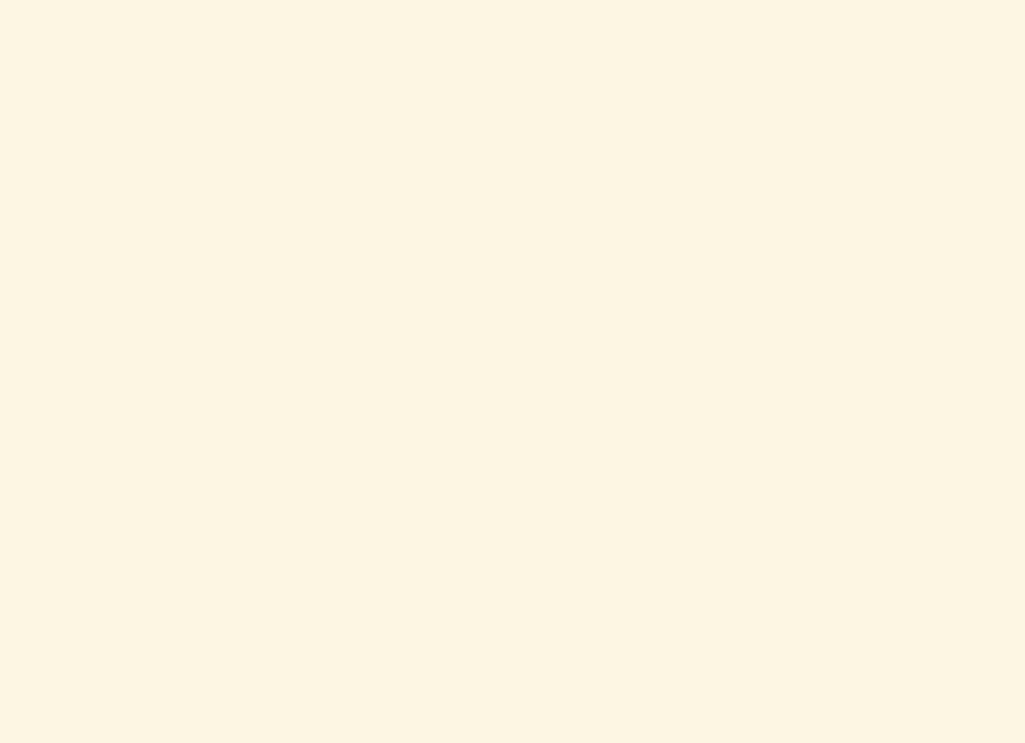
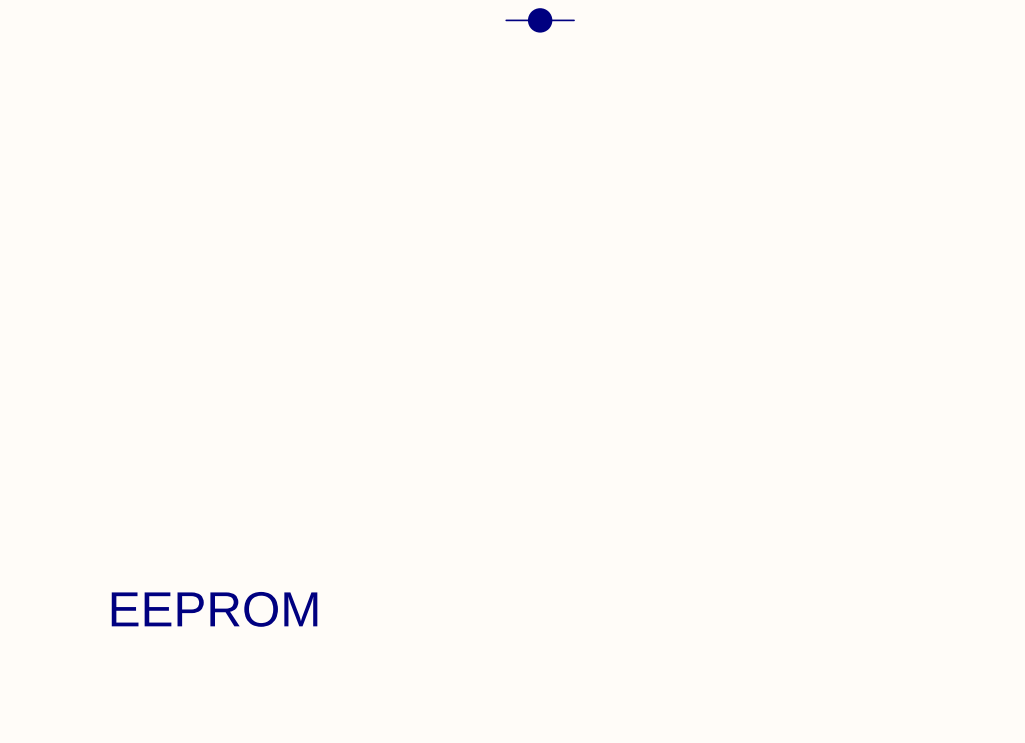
wire: none -> (506, 20) (574, 20)
junction: none -> (540, 20)
text: none -> EEPROM (214, 609)

